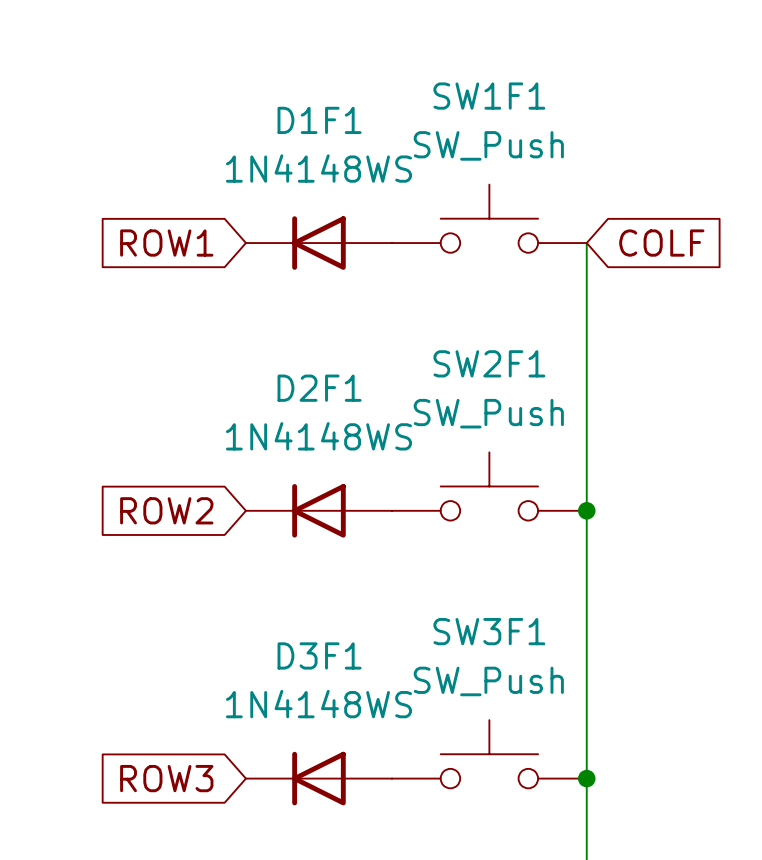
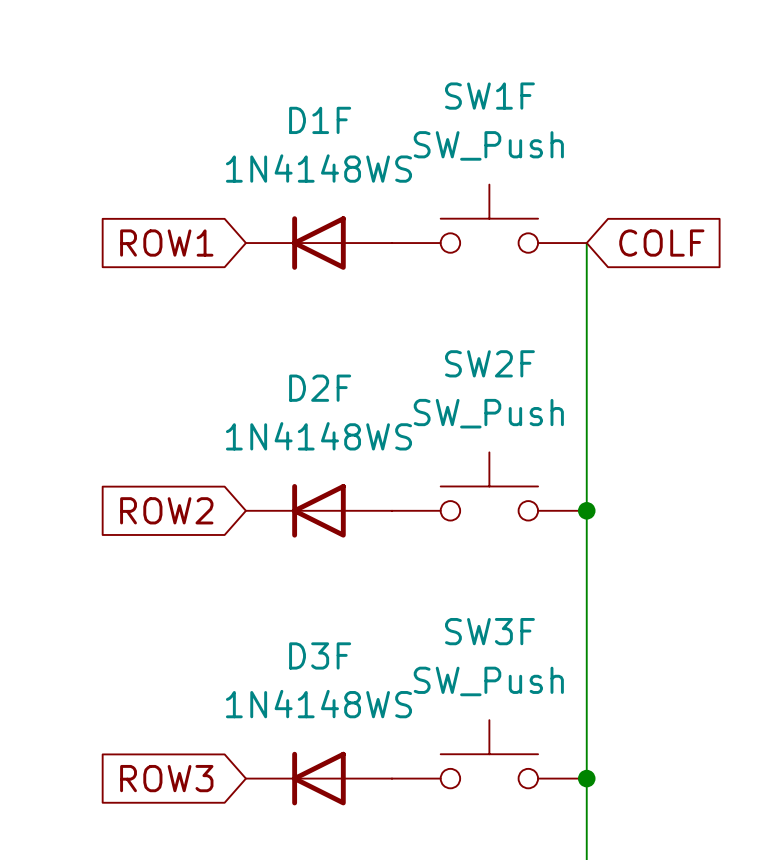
SW1F1 name: SW1F1 (489, 96) -> SW1F (489, 96)
D1F1 name: D1F1 (319, 120) -> D1F (320, 120)
SW2F1 name: SW2F1 (489, 363) -> SW2F (489, 363)
D2F1 name: D2F1 (319, 388) -> D2F (320, 388)
SW3F1 name: SW3F1 (489, 631) -> SW3F (489, 631)
D3F1 name: D3F1 (319, 655) -> D3F (320, 655)

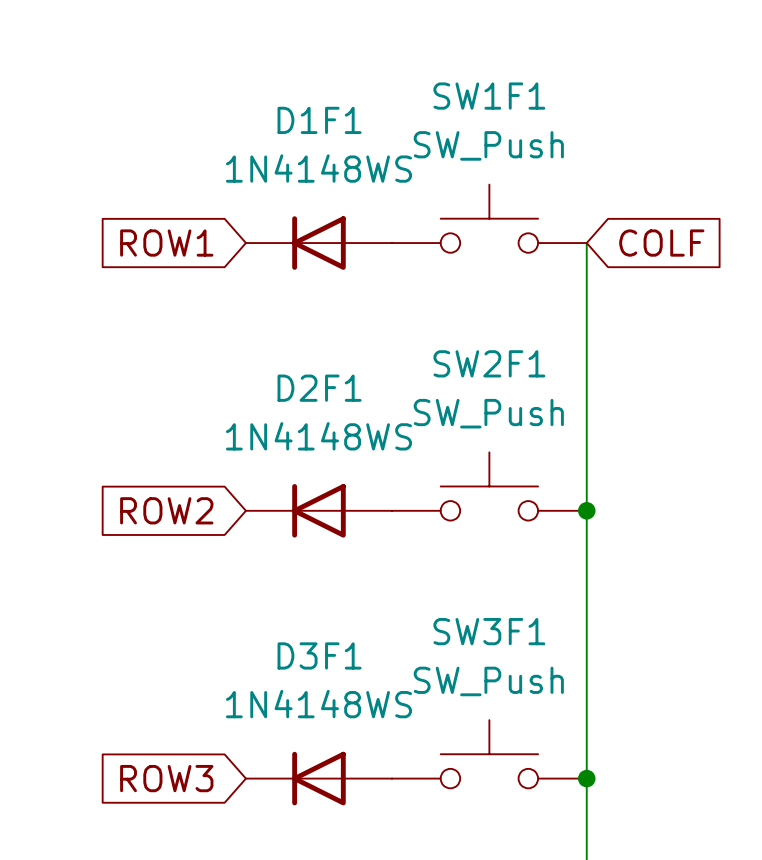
SW1F name: SW1F (489, 96) -> SW1F1 (489, 96)
D1F name: D1F (320, 120) -> D1F1 (319, 120)
SW2F name: SW2F (489, 363) -> SW2F1 (489, 363)
D2F name: D2F (320, 388) -> D2F1 (319, 388)
SW3F name: SW3F (489, 631) -> SW3F1 (489, 631)
D3F name: D3F (320, 655) -> D3F1 (319, 655)

